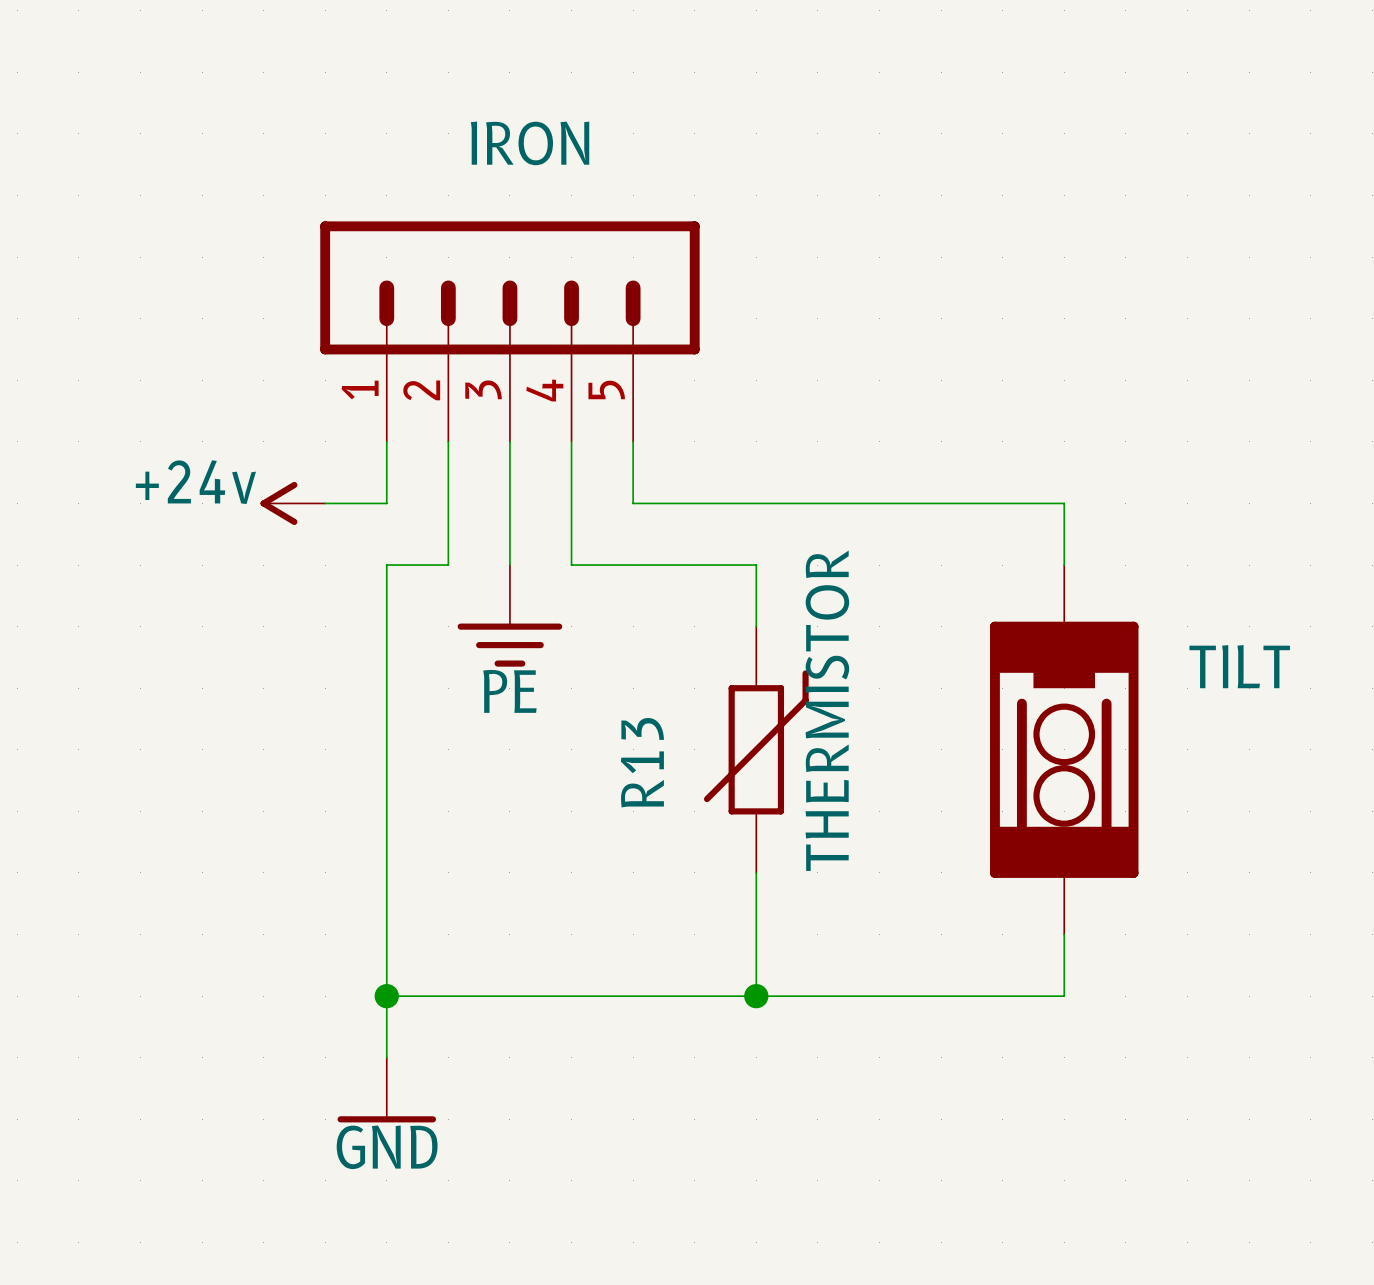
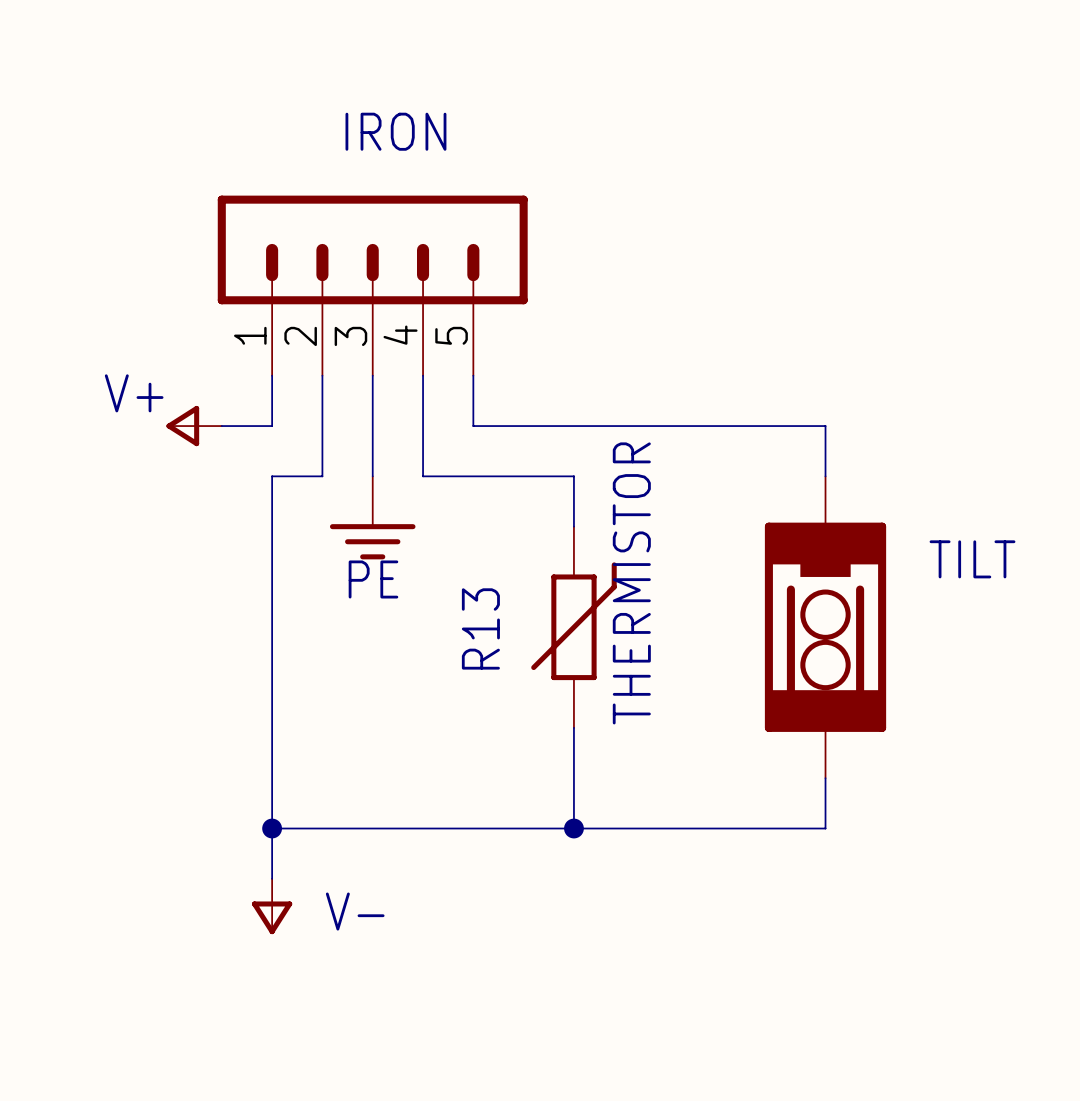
power symbol: +24v (292, 503) -> V+ (194, 426)
power symbol: GND (386, 1090) -> V- (272, 906)

